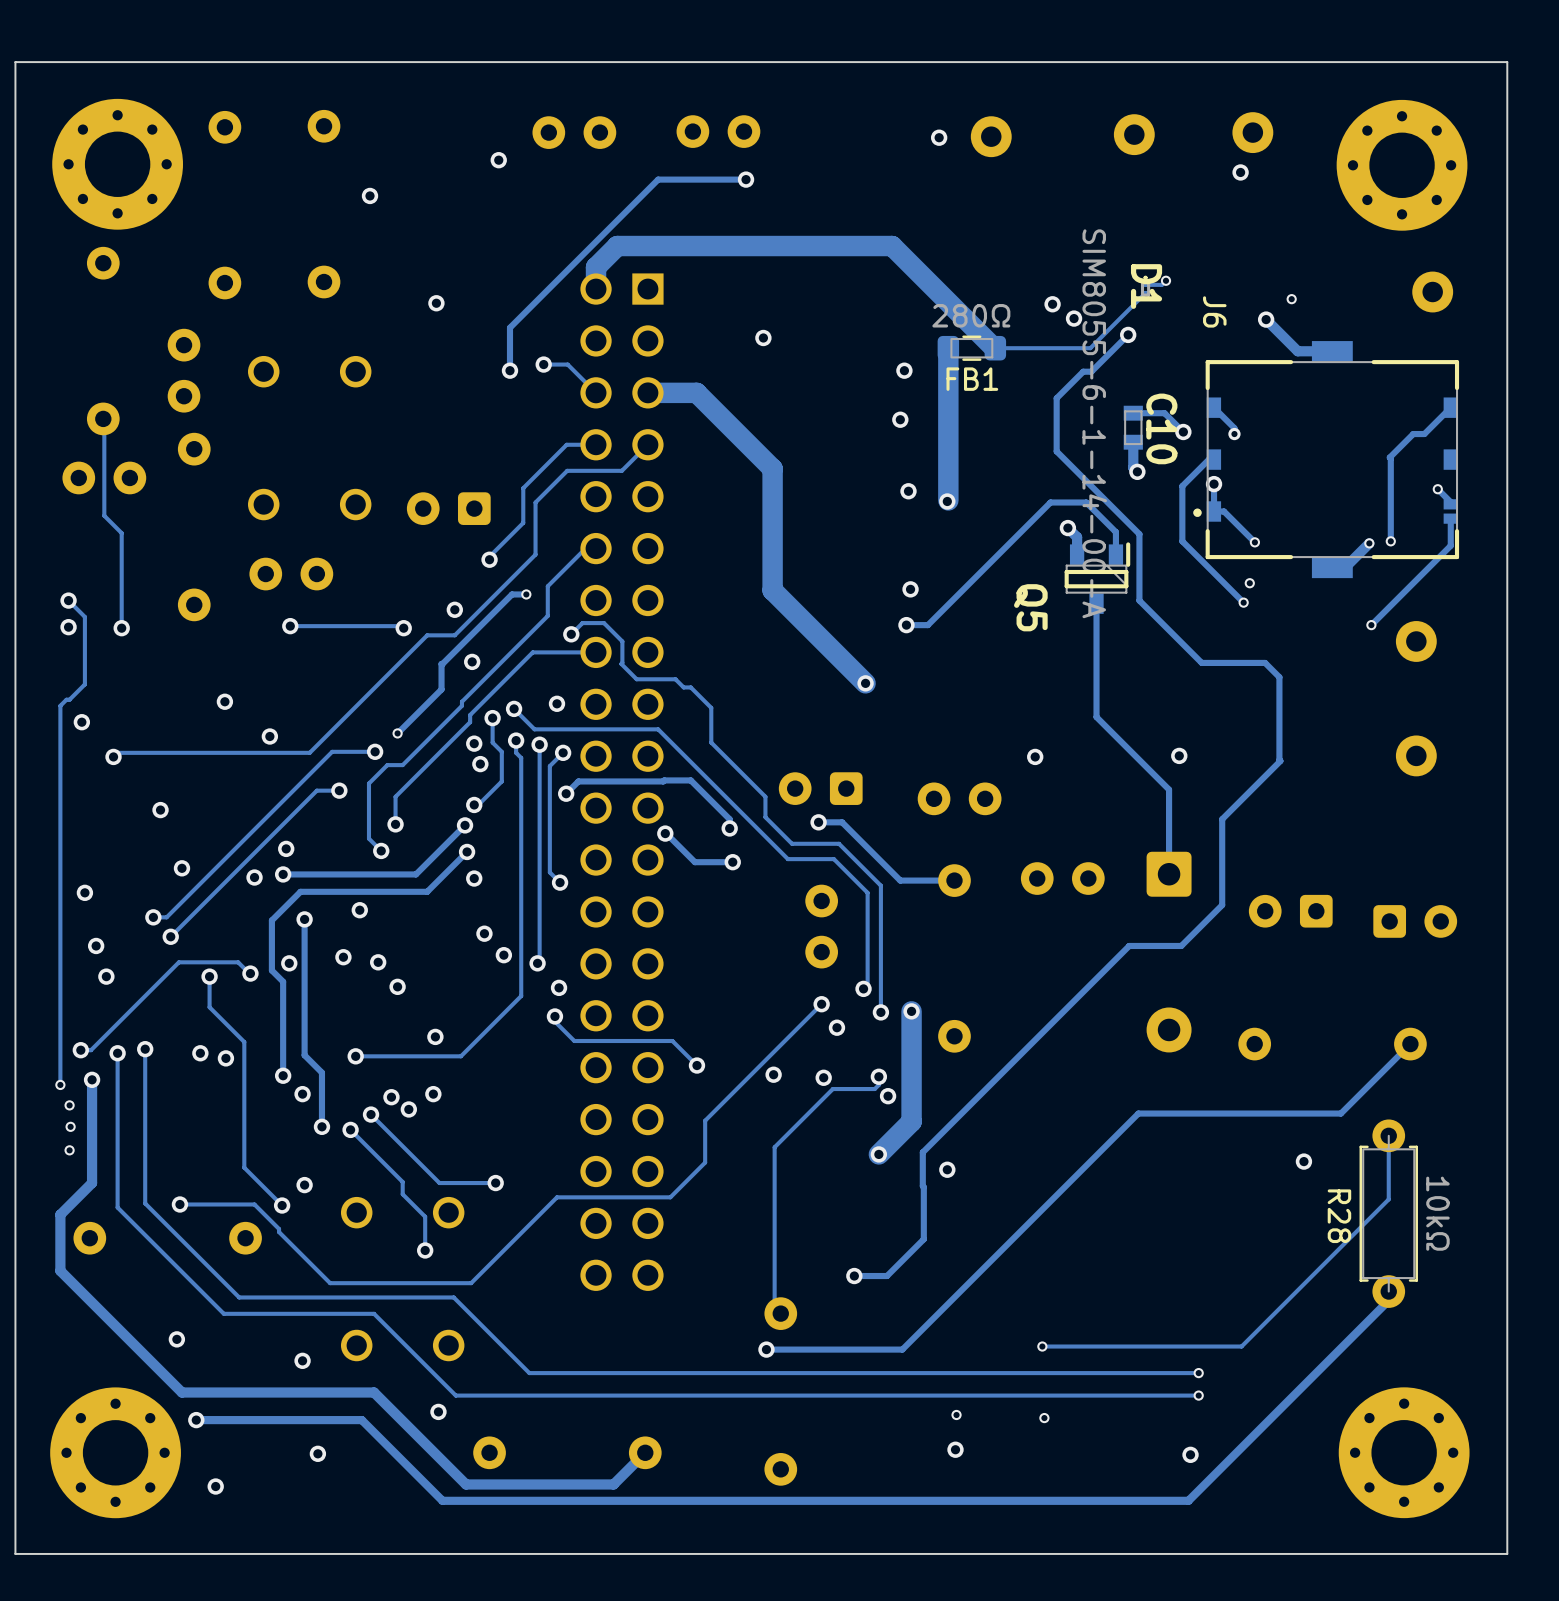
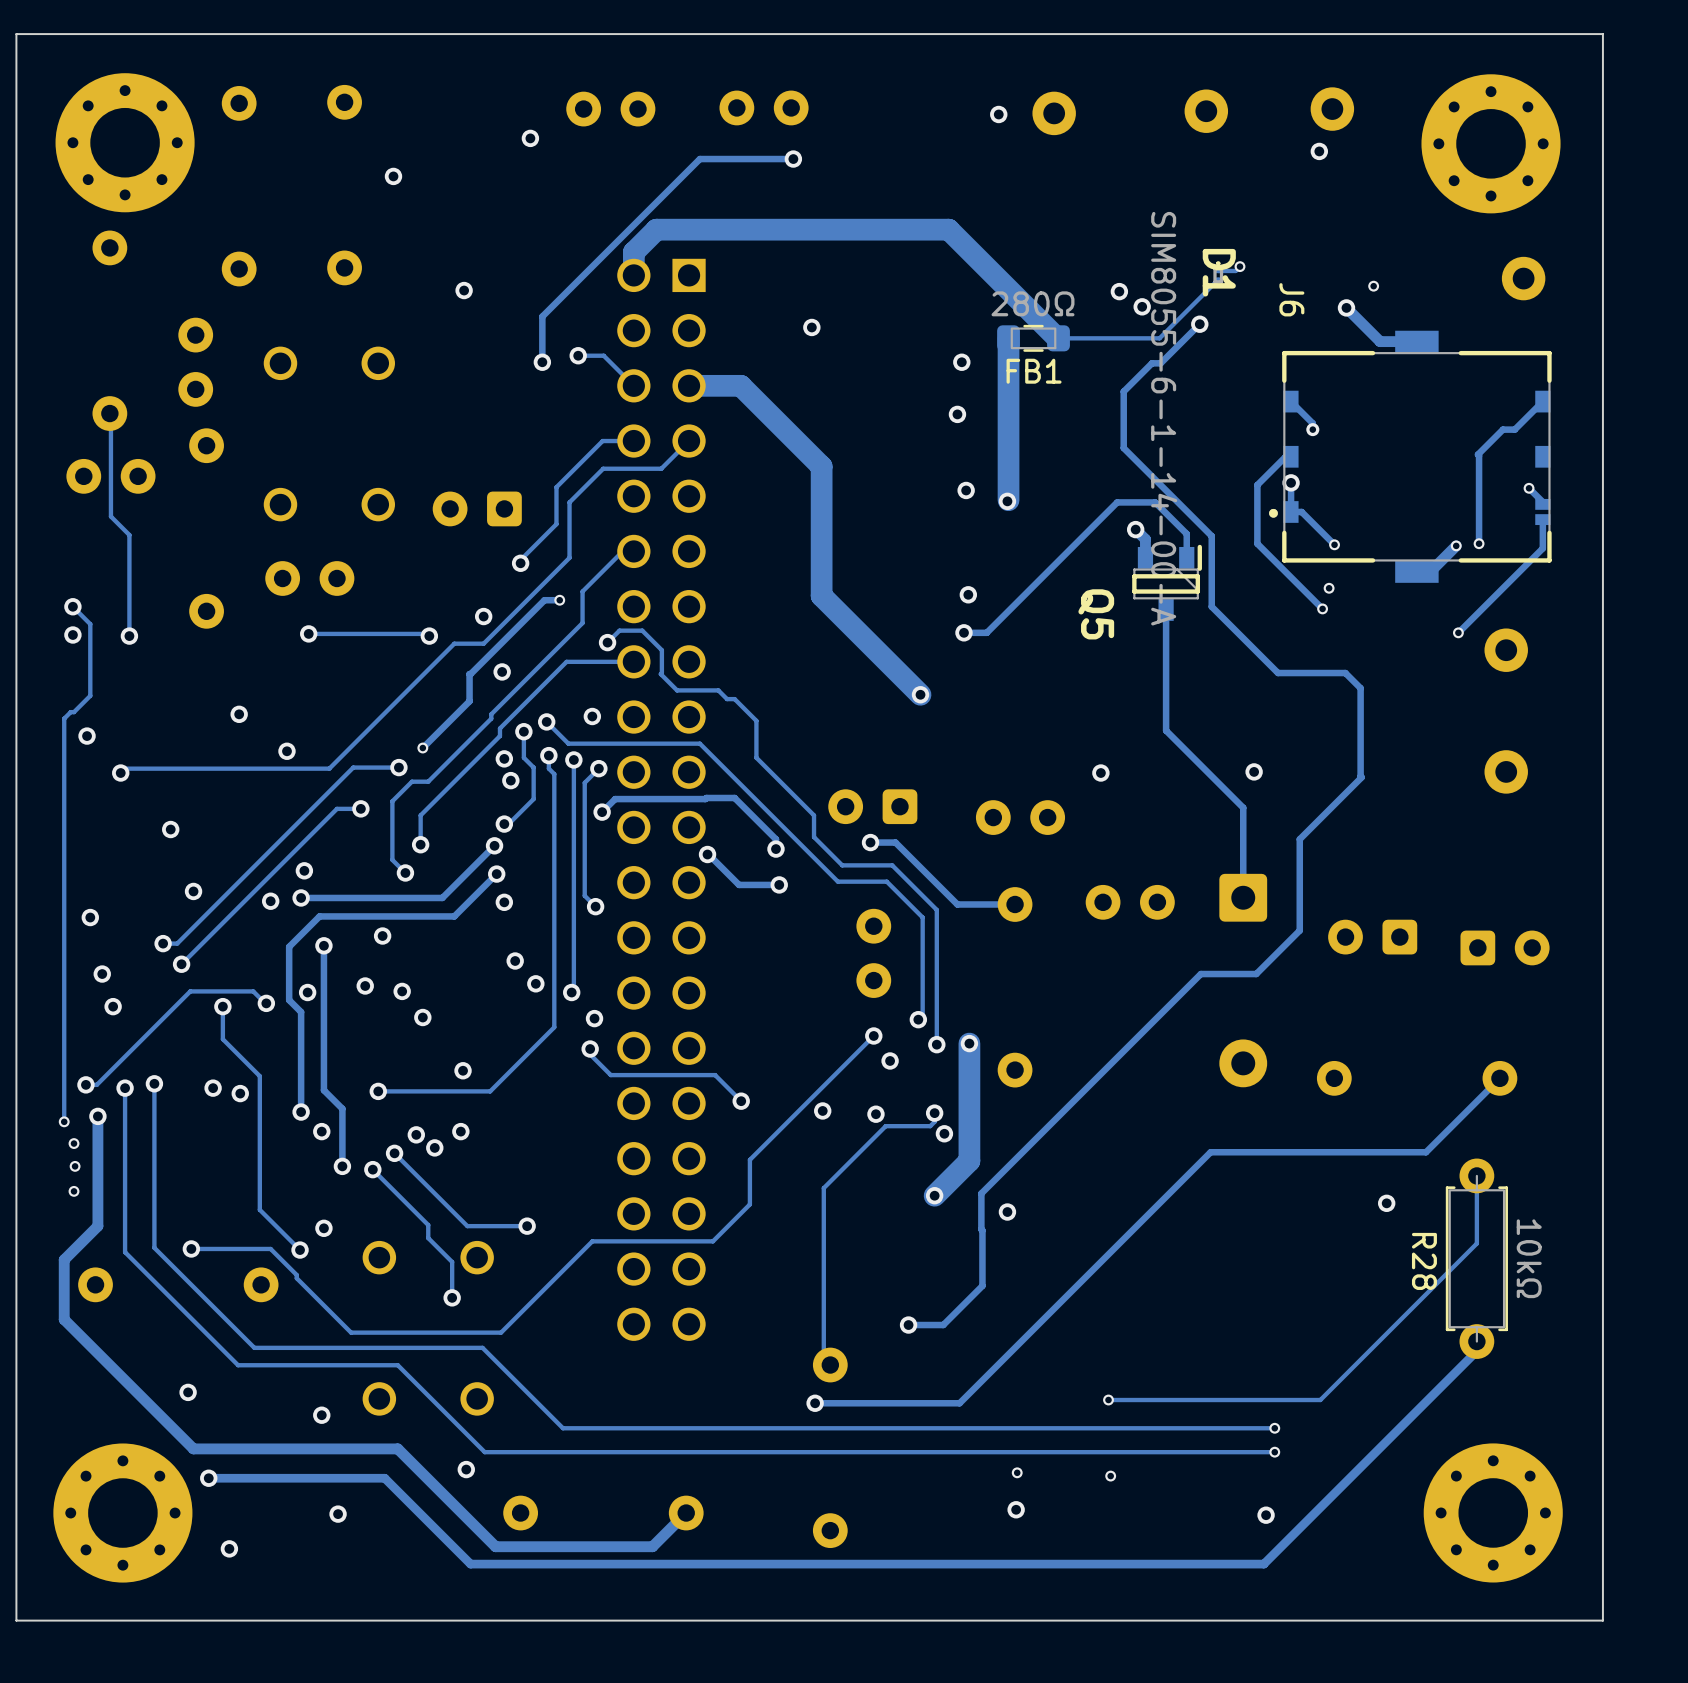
track: (1133, 413) (1164, 413) (1183, 432) -> none
C10: (1133, 427) -> none
via: (1183, 432) -> none
track: (1133, 442) (1133, 467) (1137, 471) -> none
via: (1137, 471) -> none

